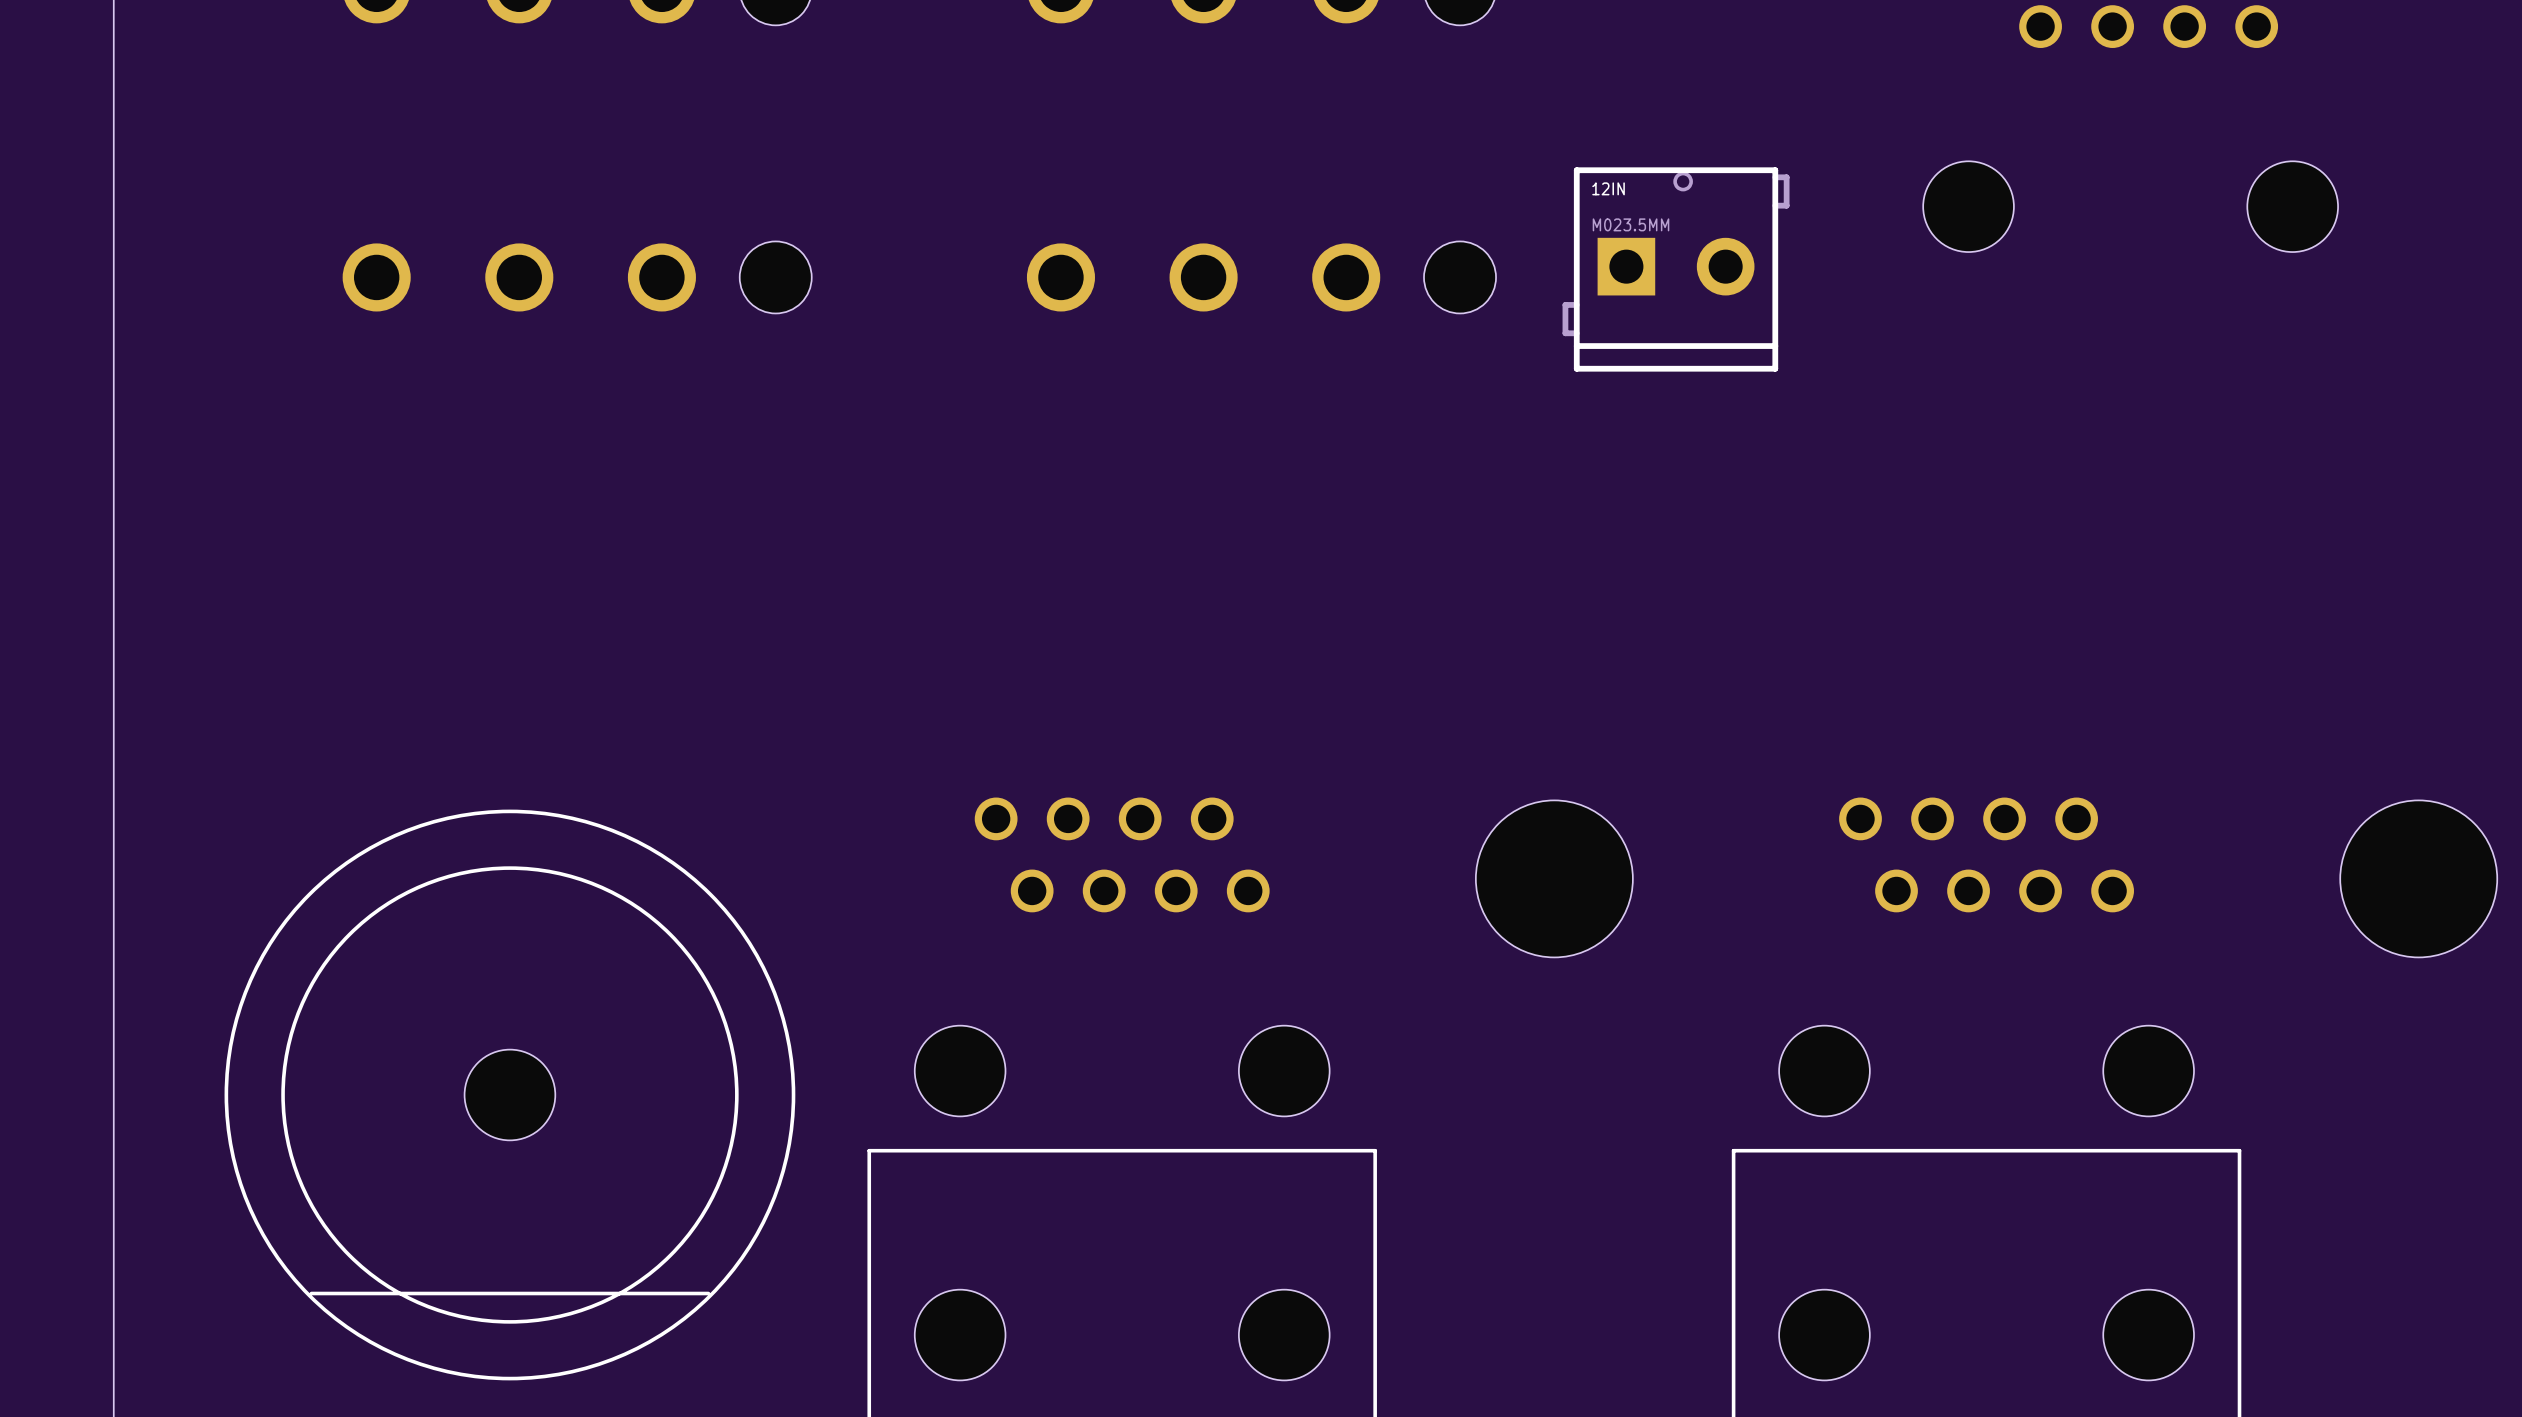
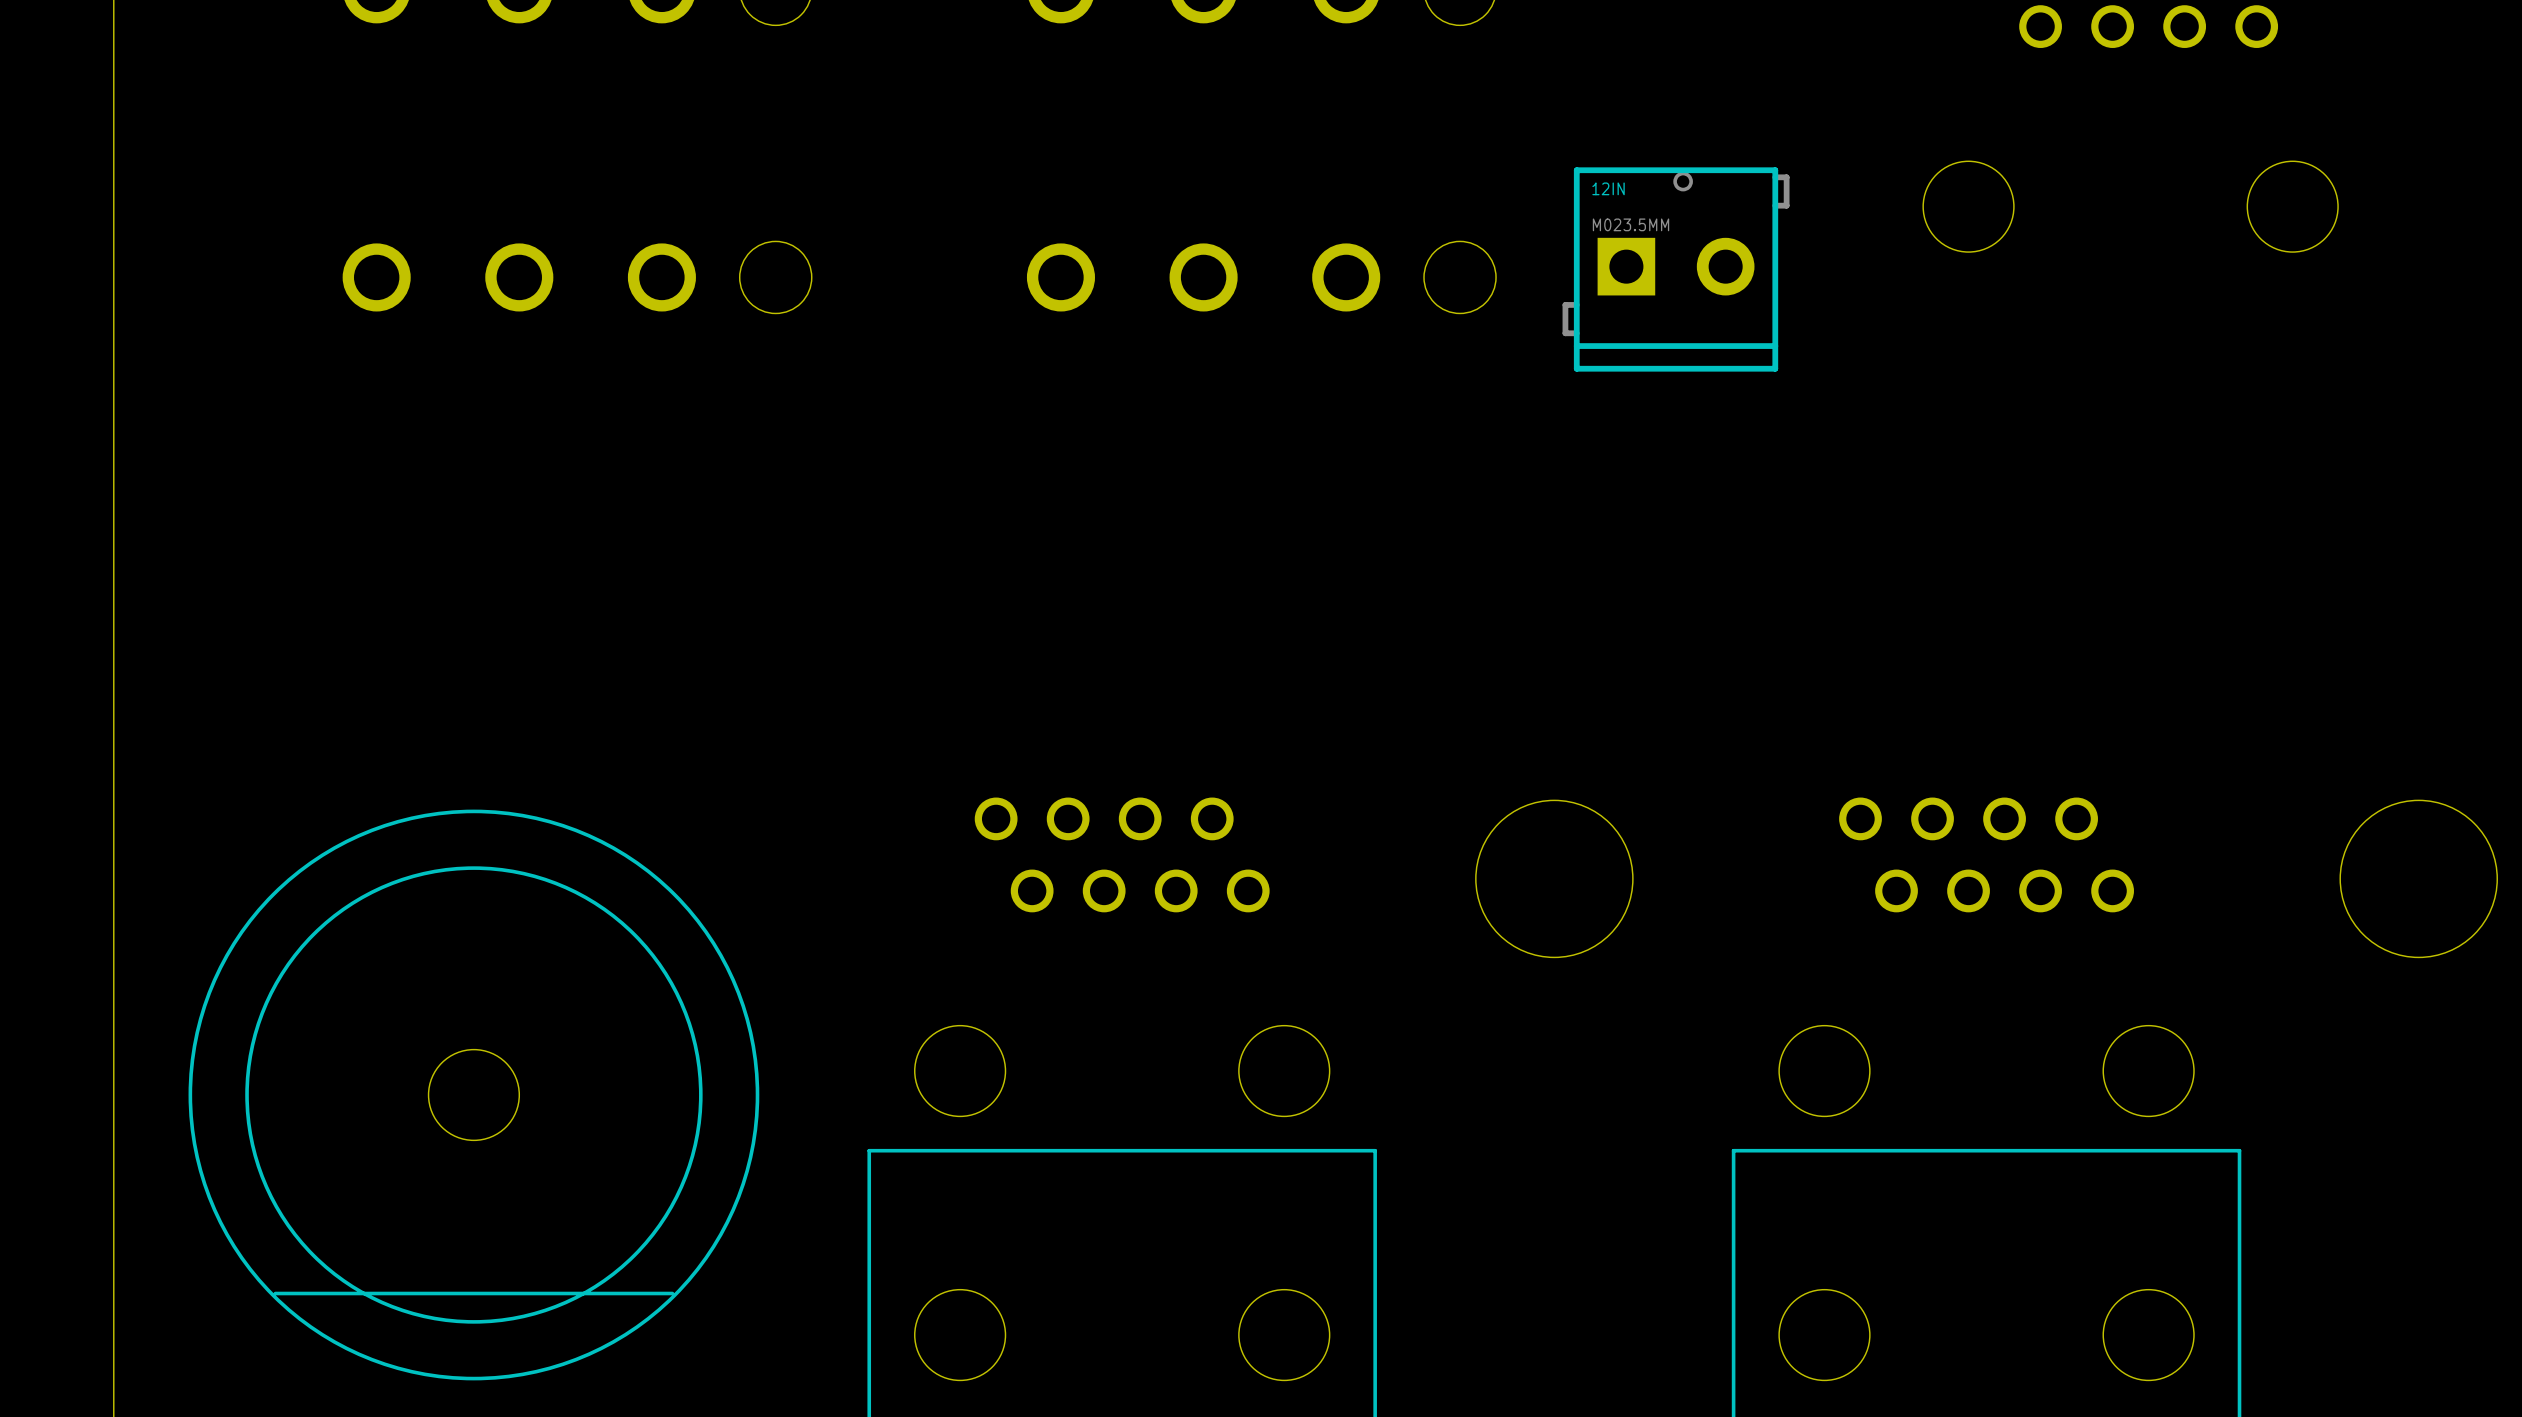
part position: (509, 1094) -> (473, 1094)

